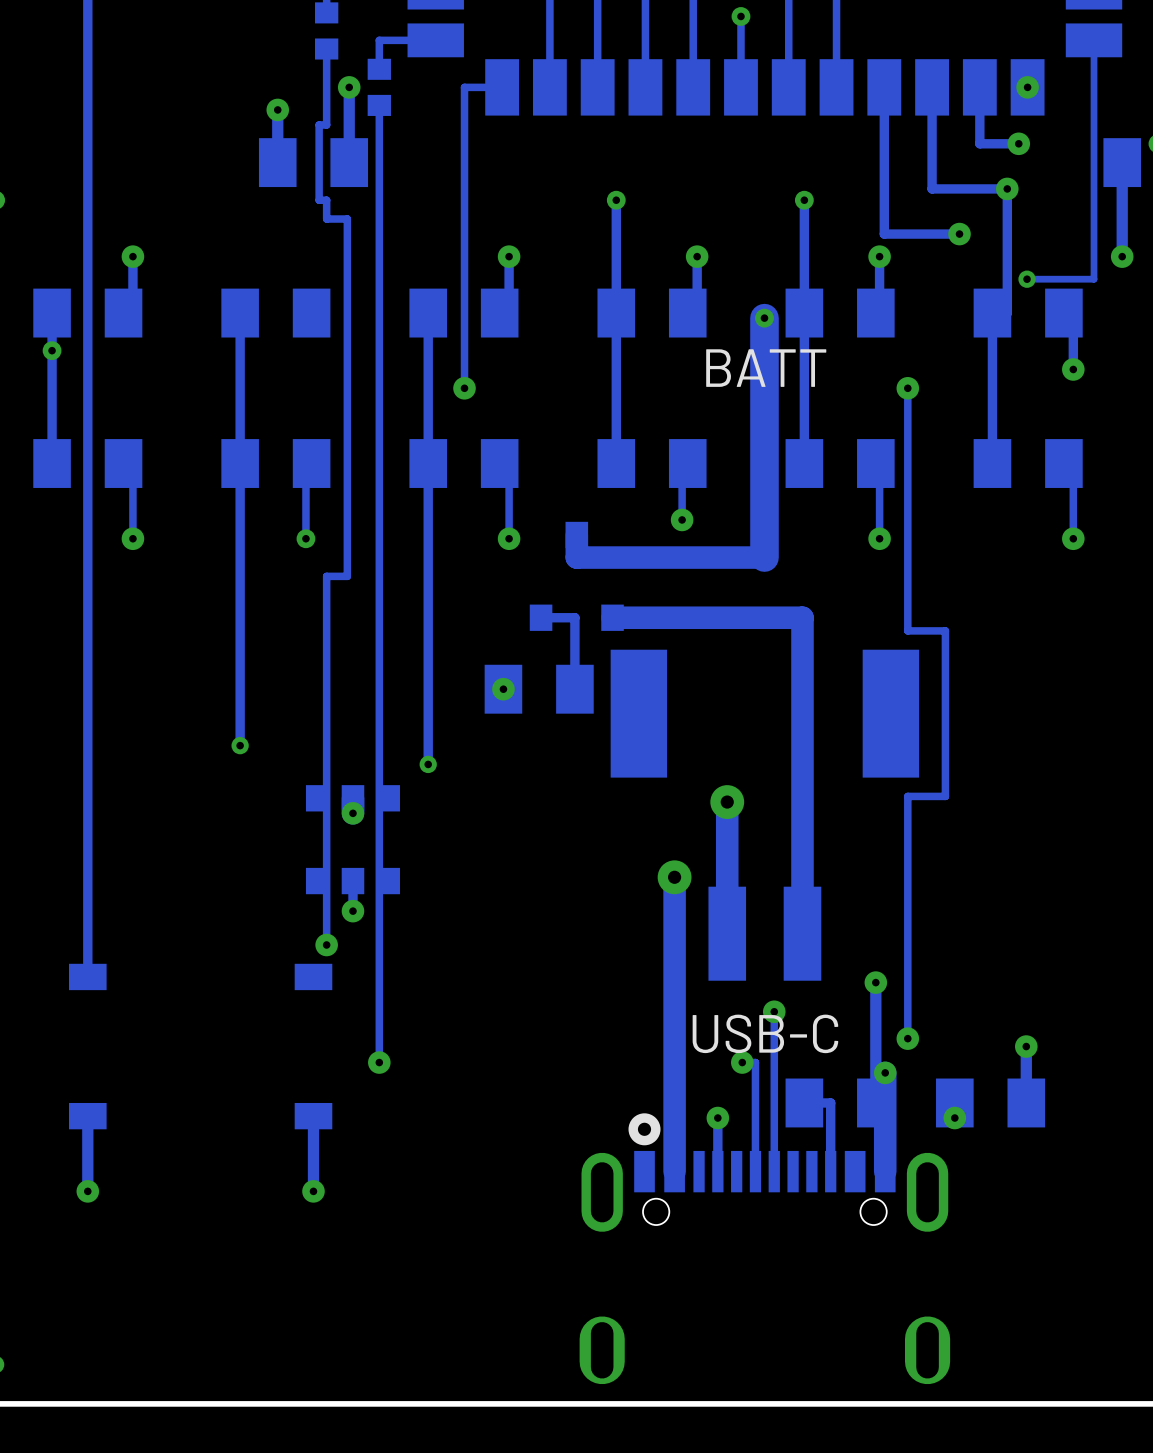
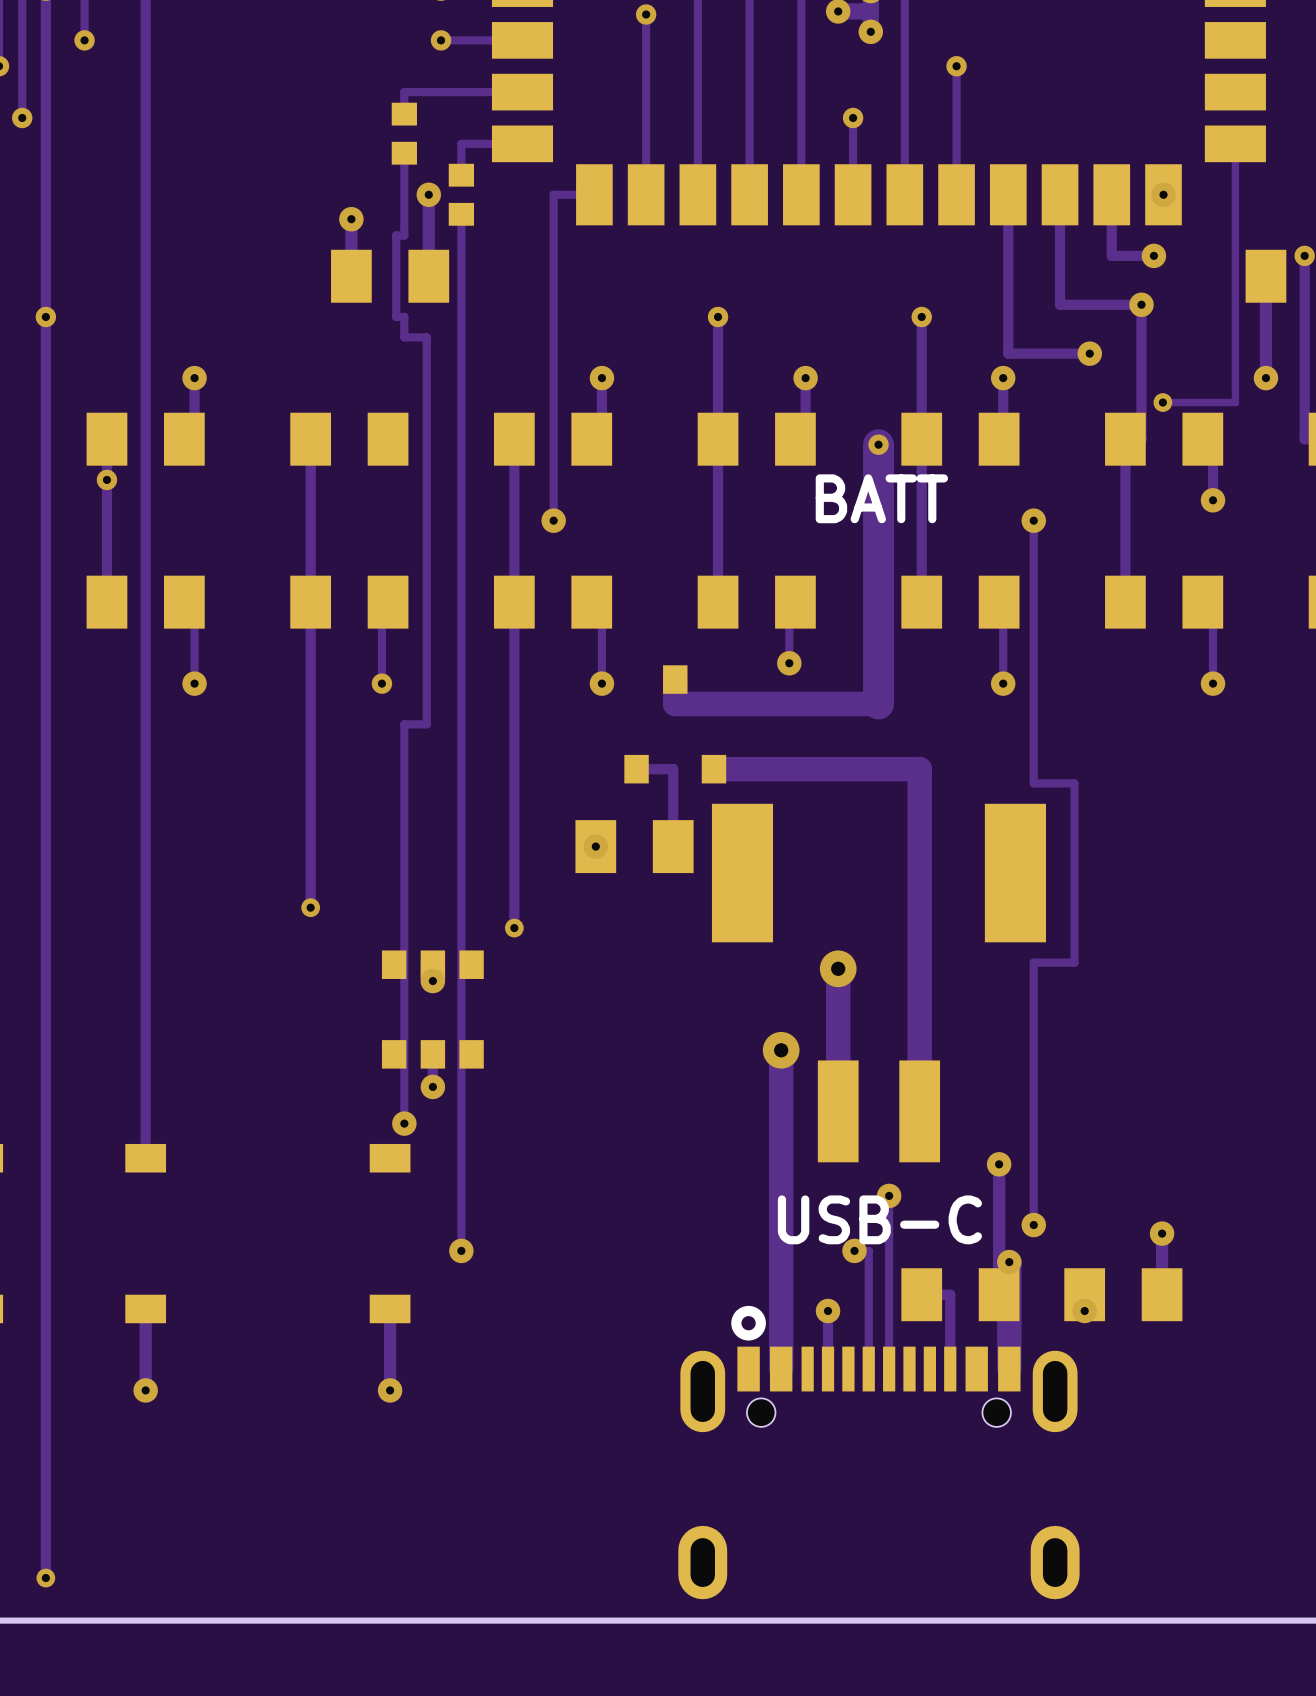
part footprint: [579, 1113, 951, 1385] -> [678, 1305, 1080, 1600]

